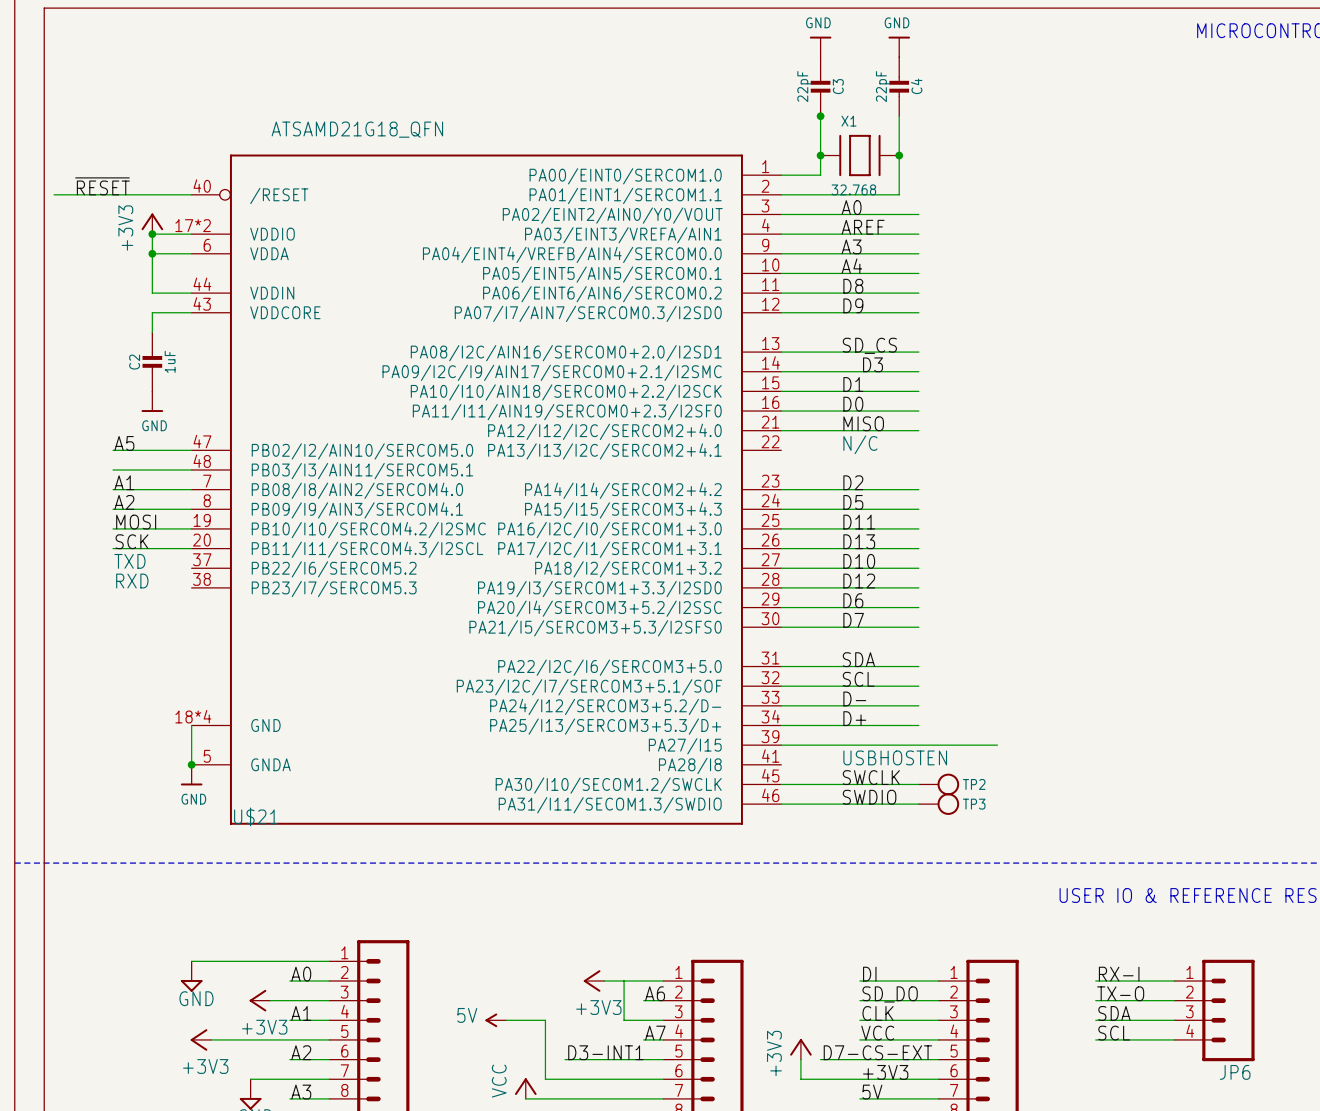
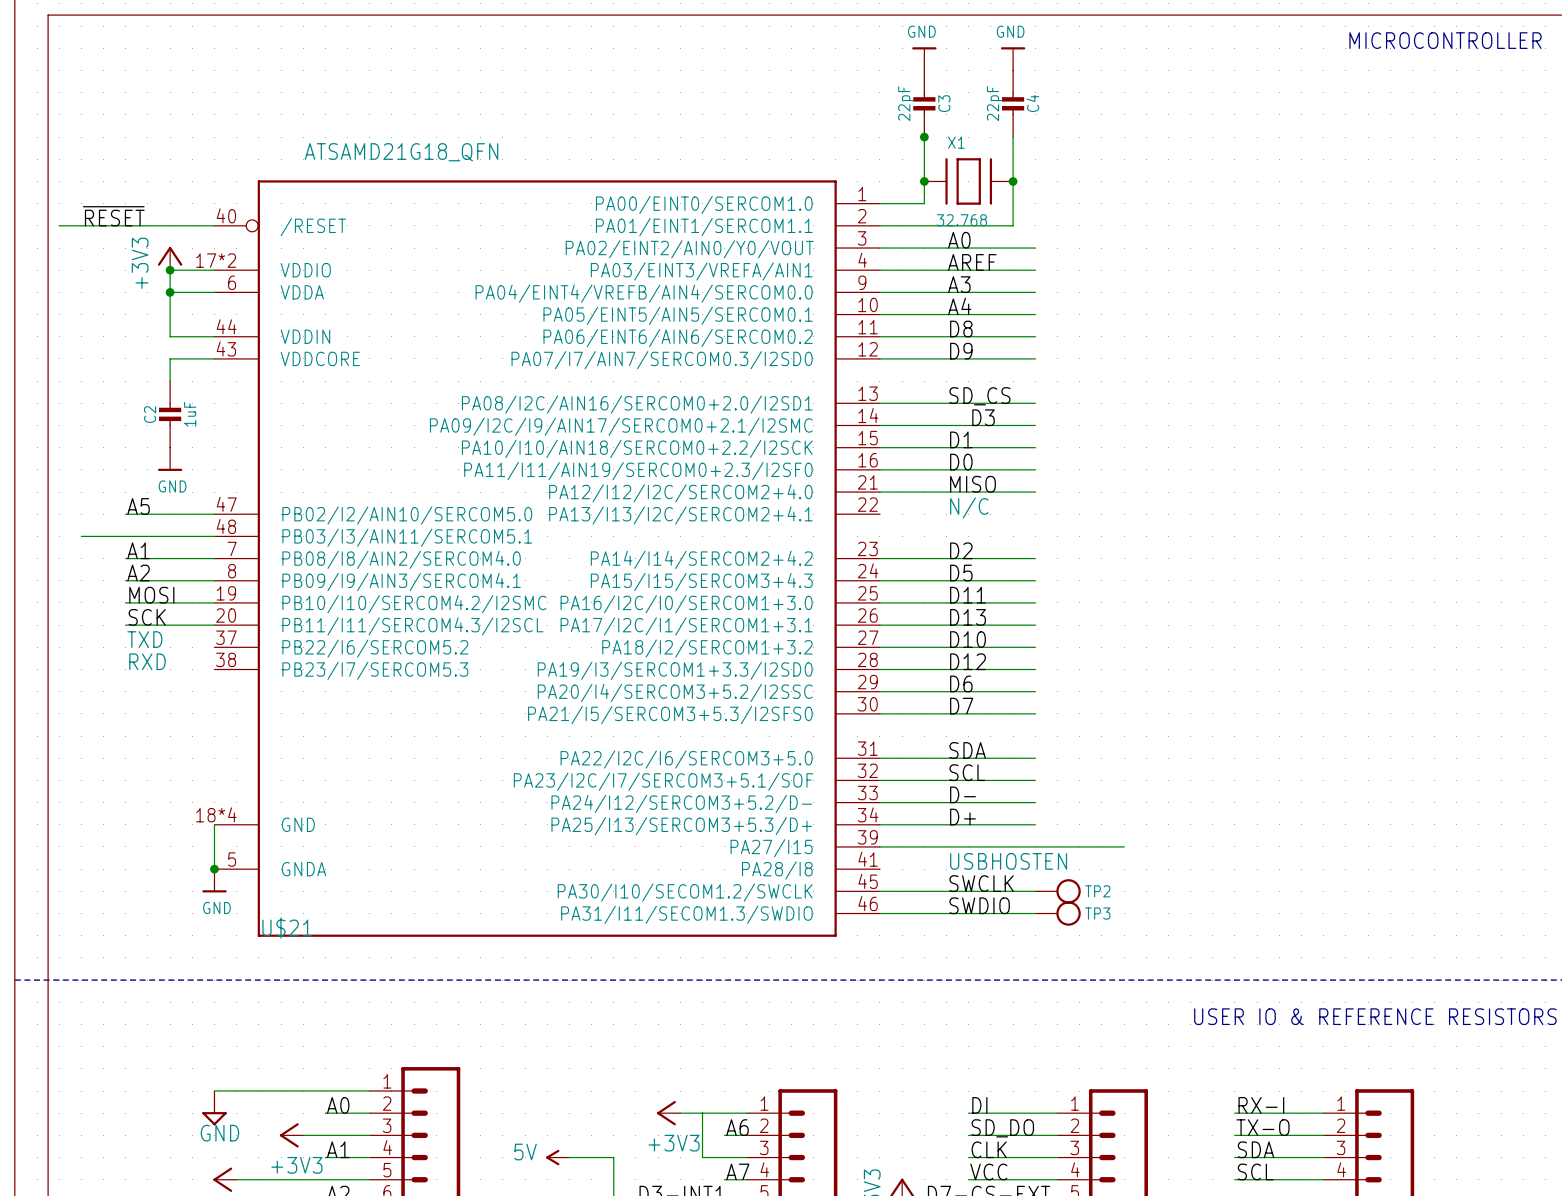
wire: none -> (81, 536) (125, 536)

